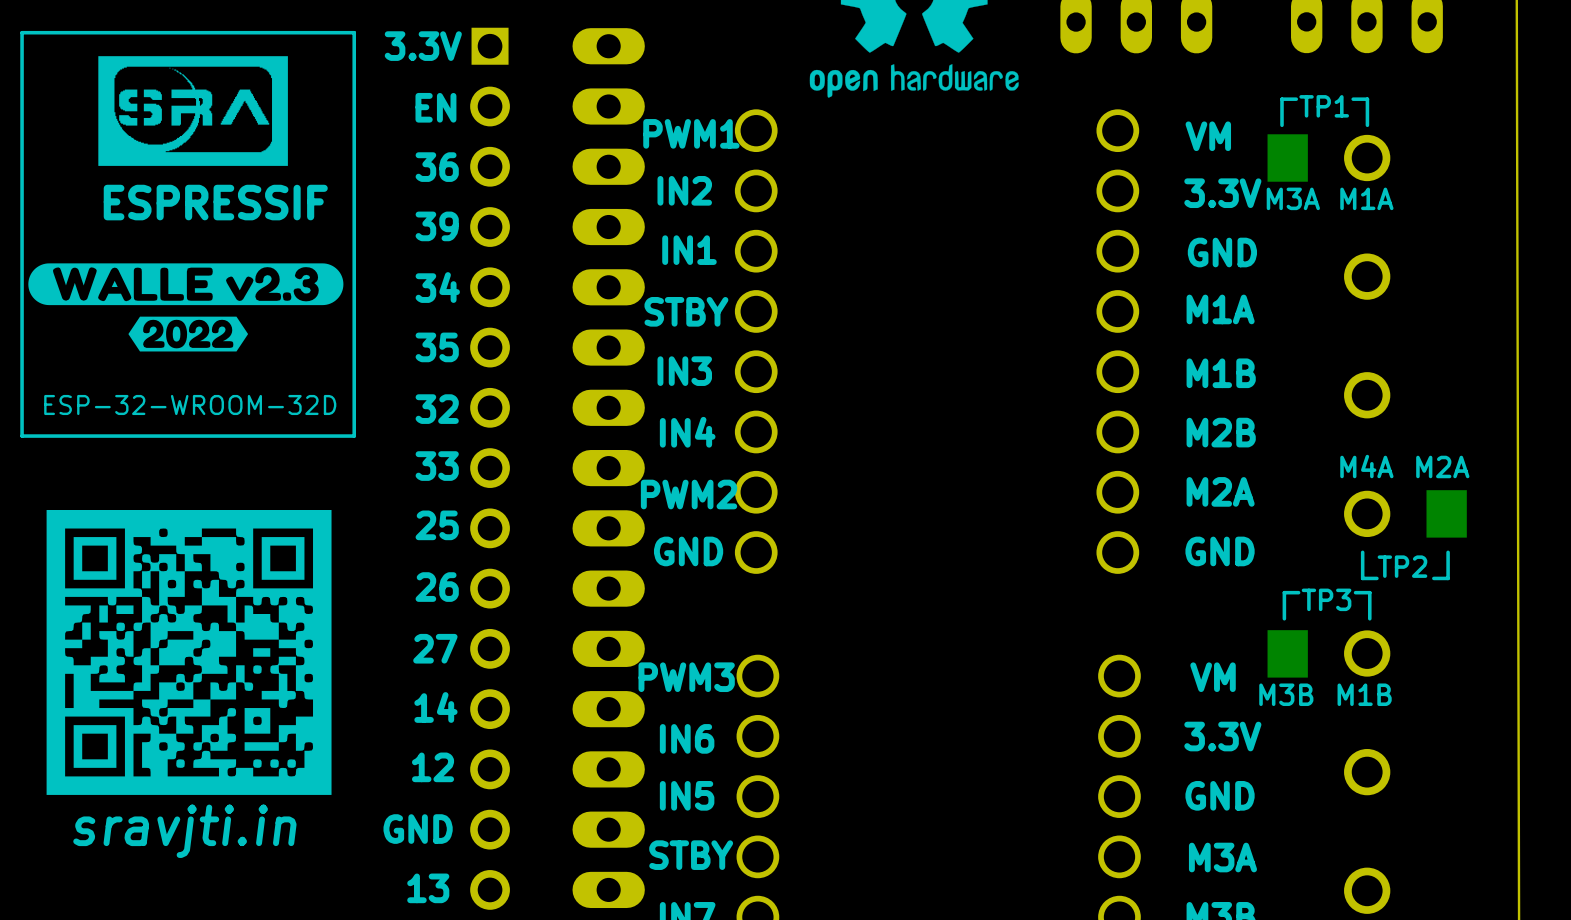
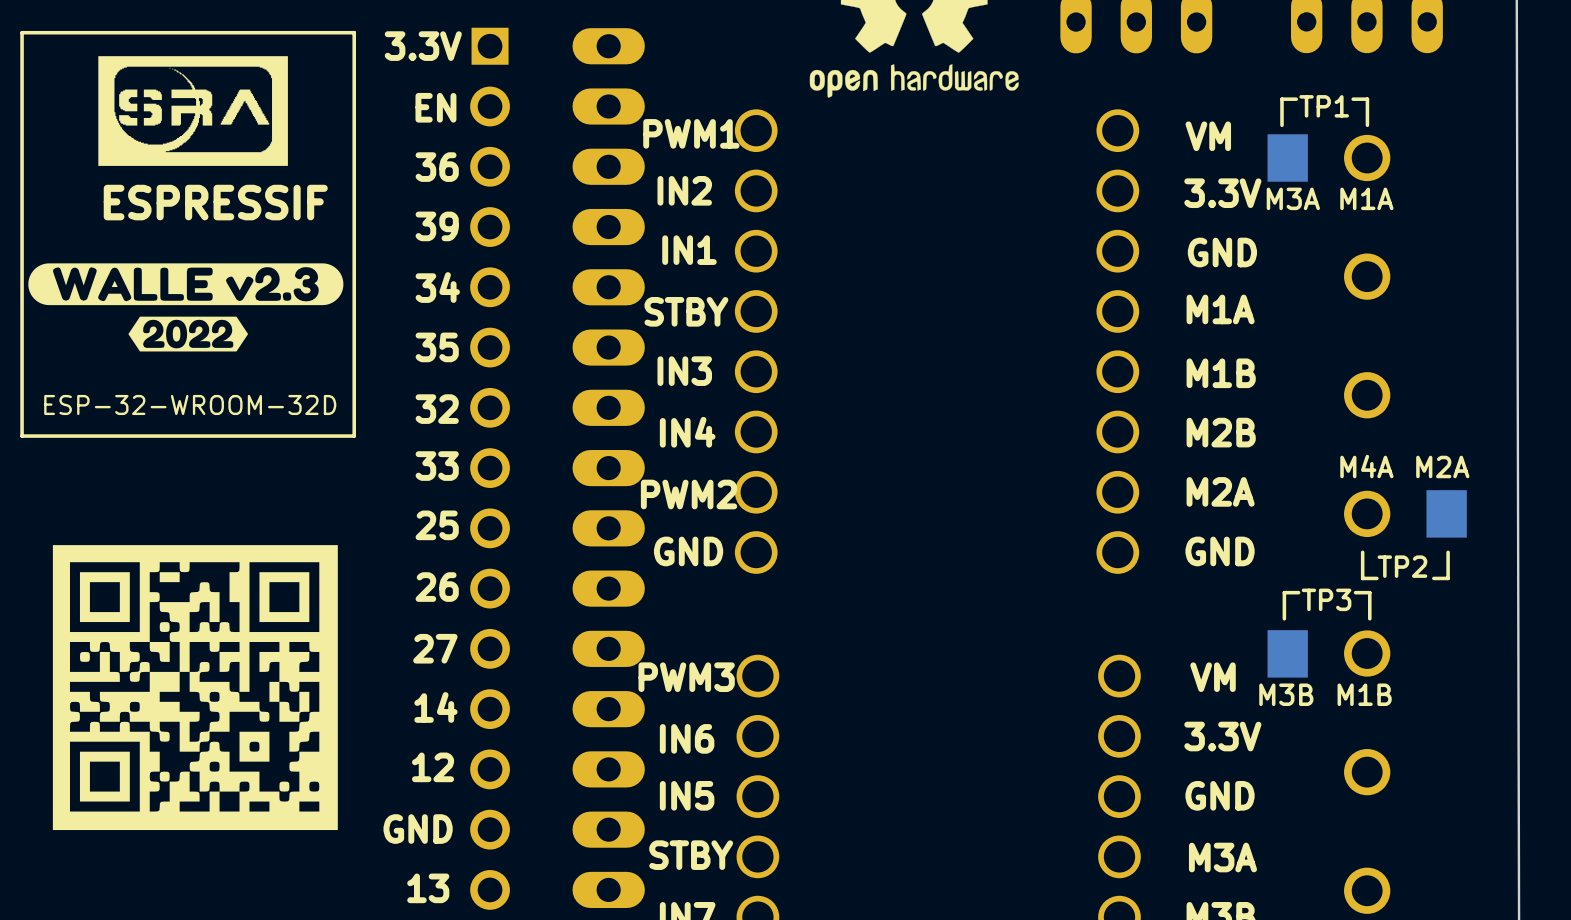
drawing: [46, 509, 332, 795] -> none
drawing: none -> [52, 545, 338, 831]
text: sravjti.in (184, 831) -> none

